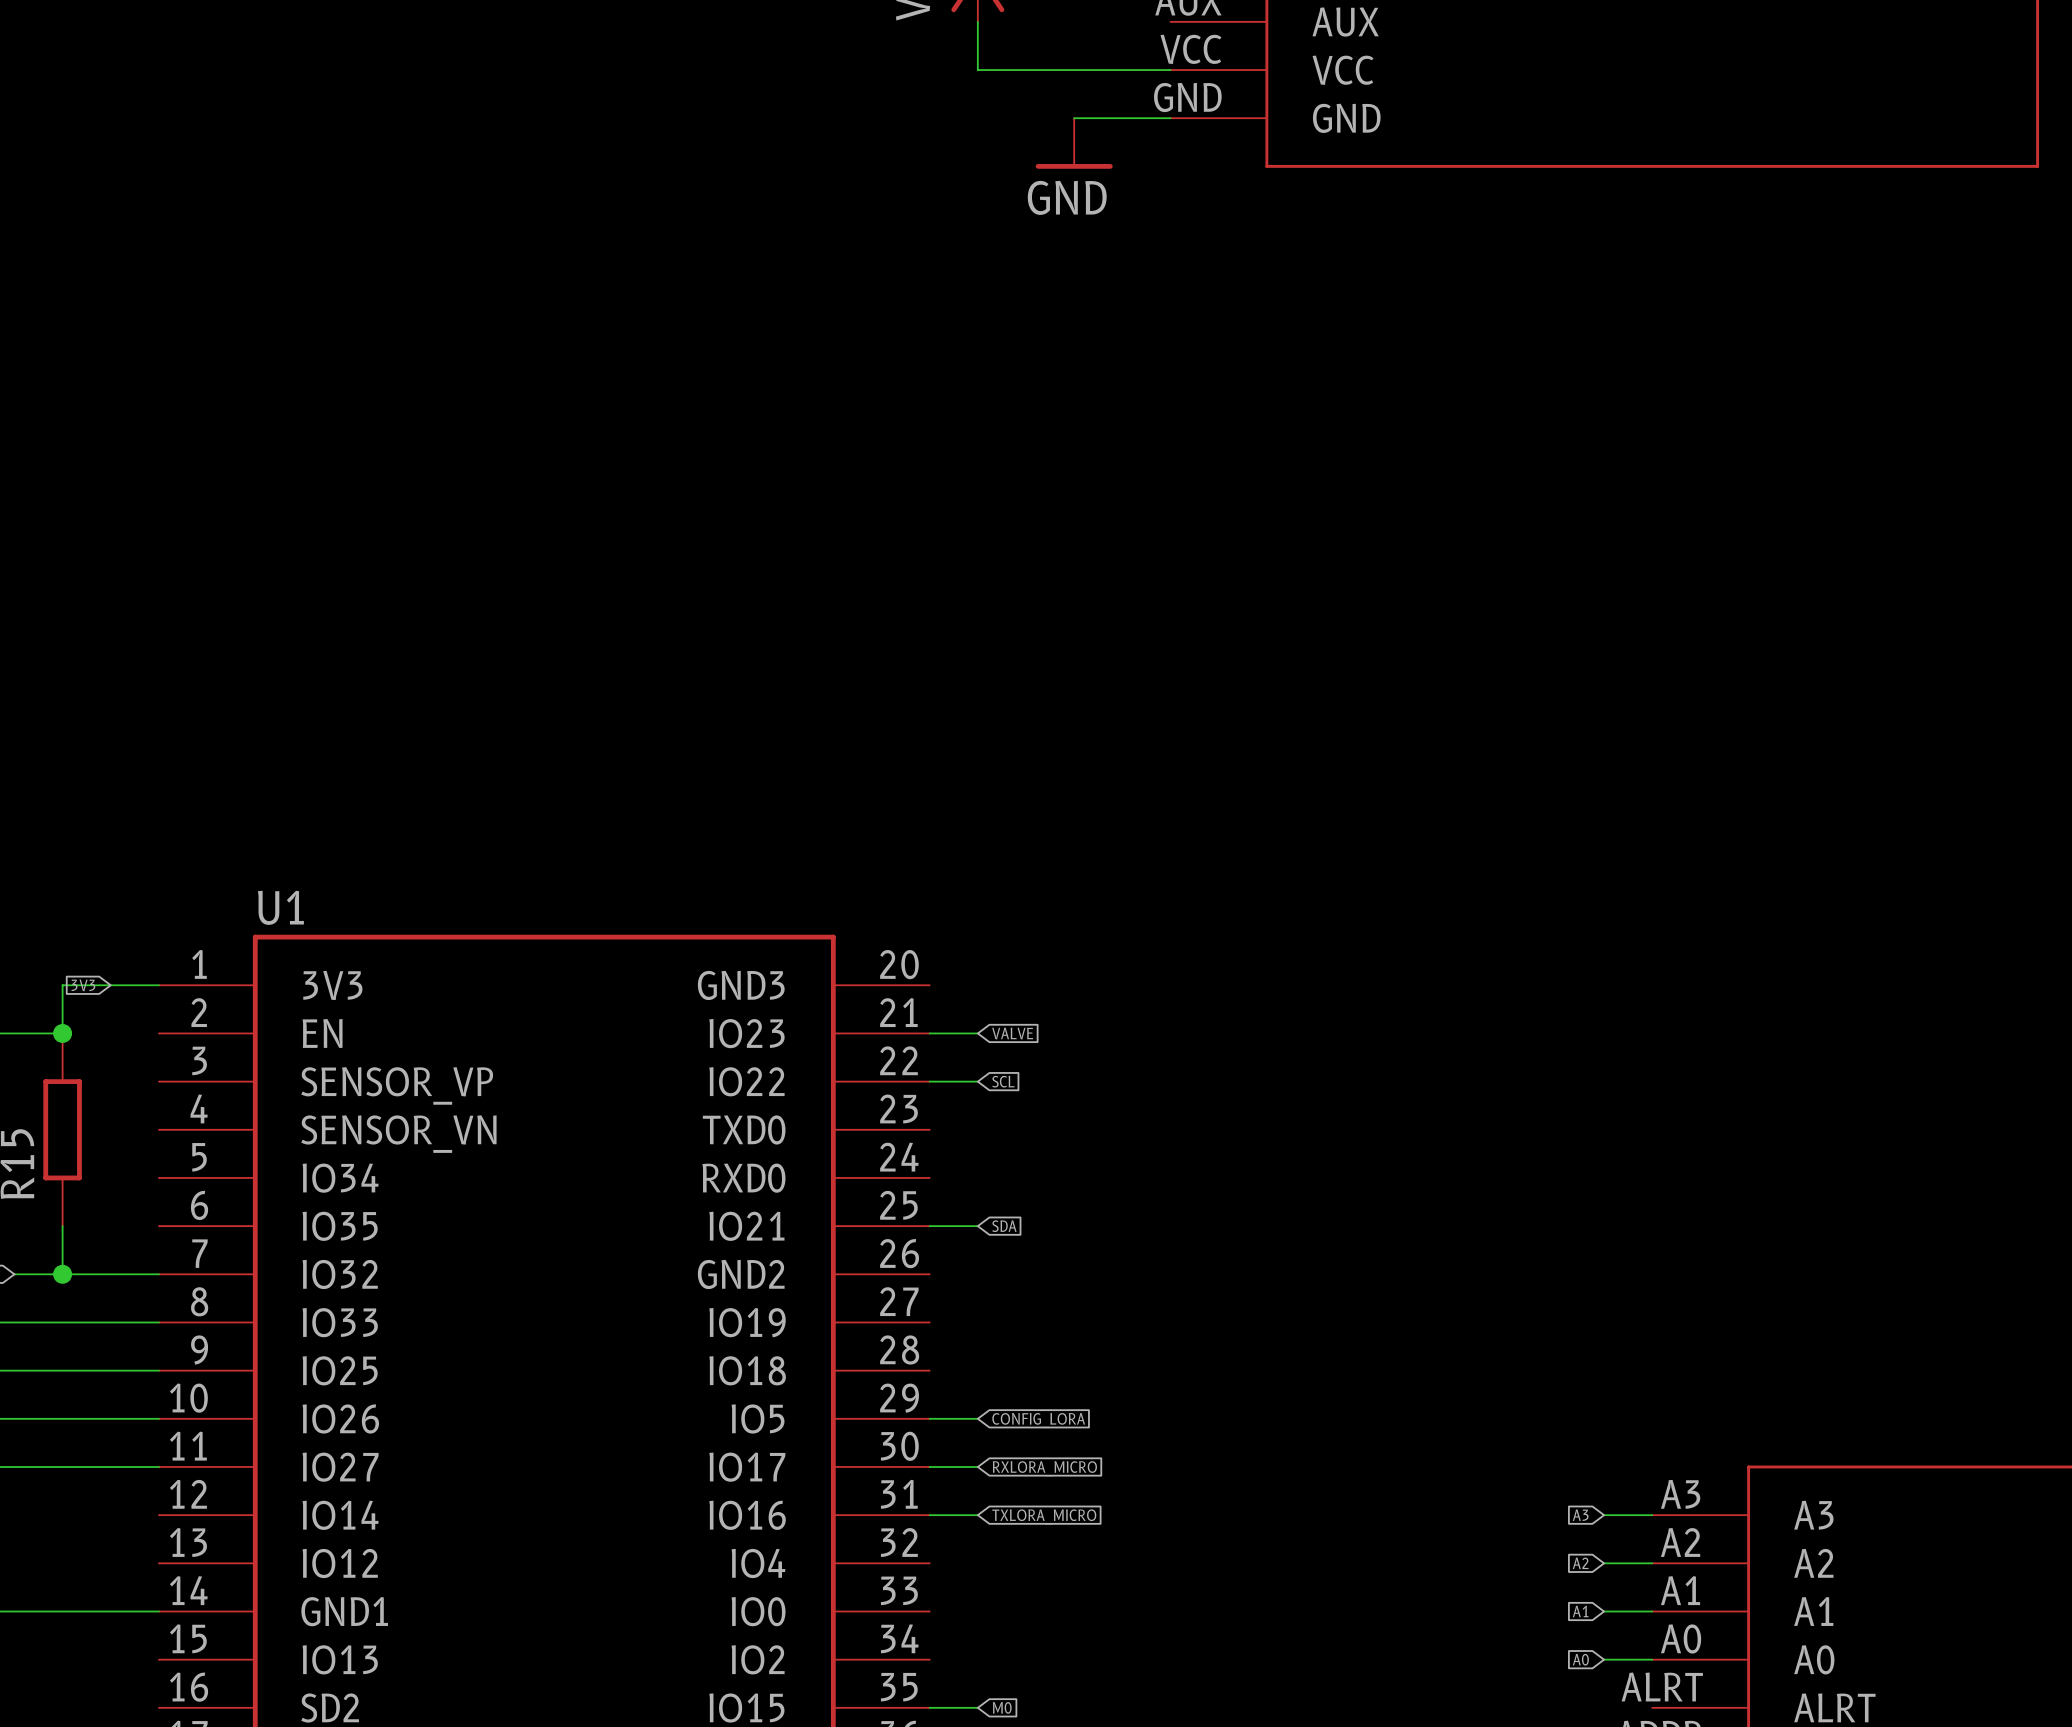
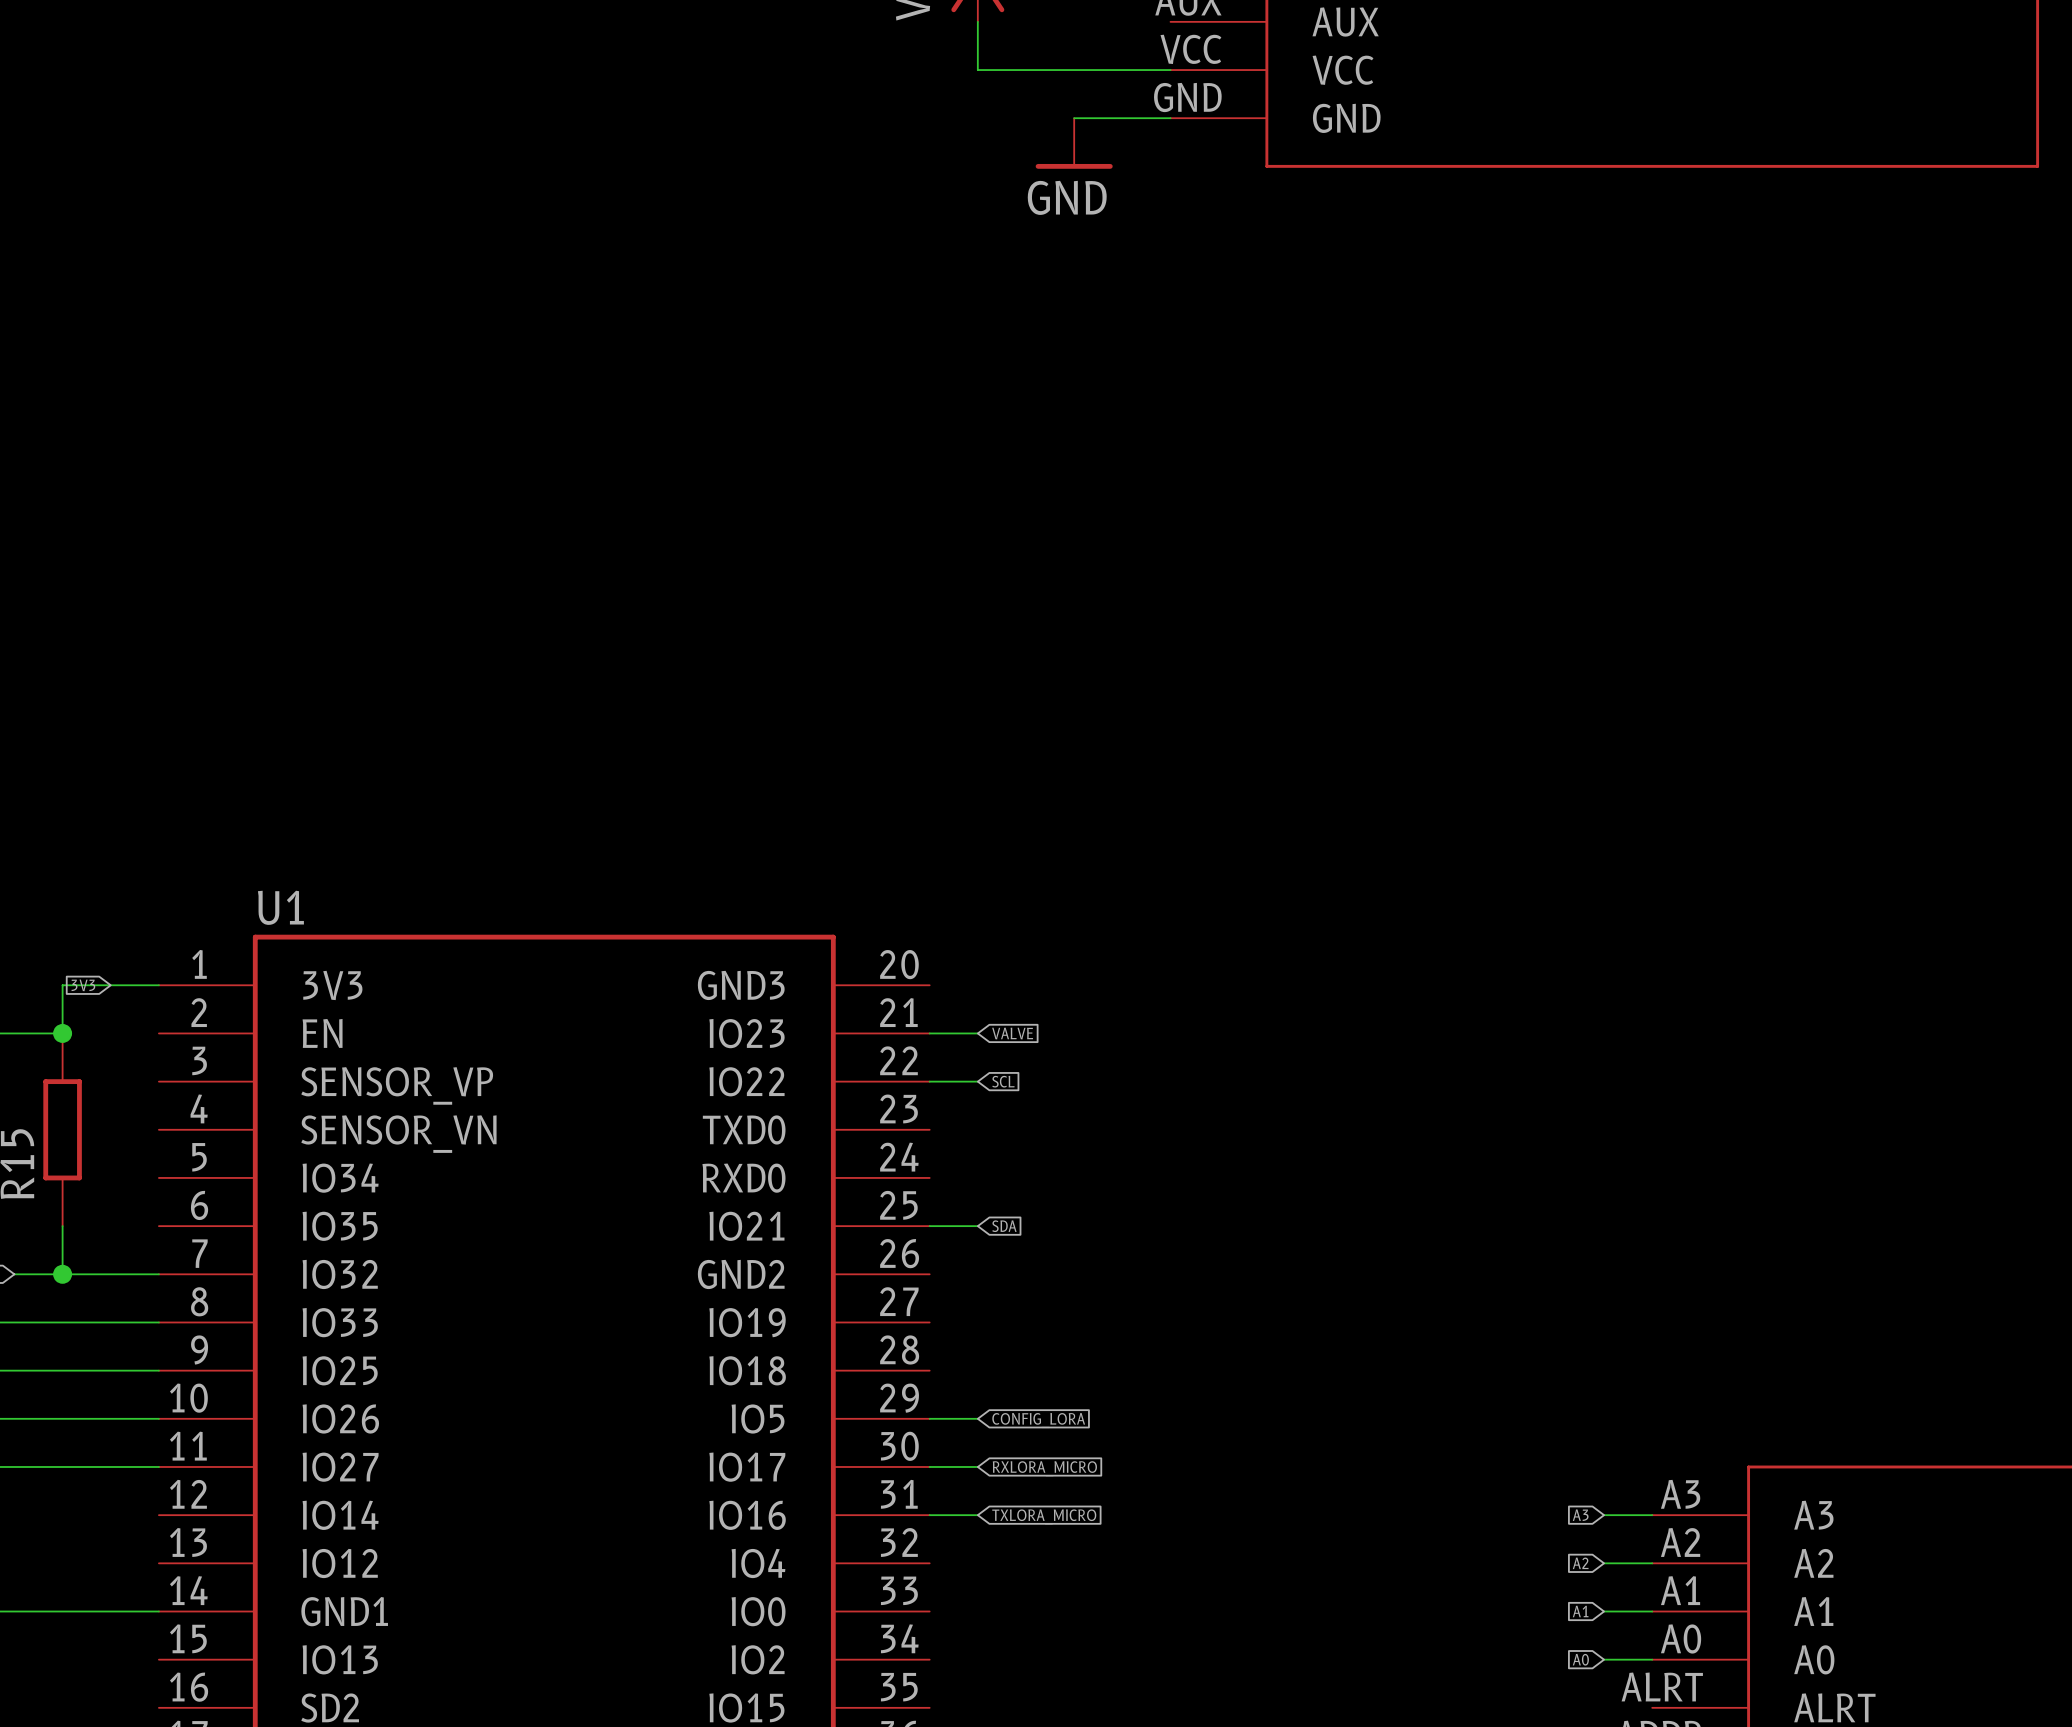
wire: (929, 1707) (977, 1707) -> none
global label: M0 (1002, 1707) -> none

